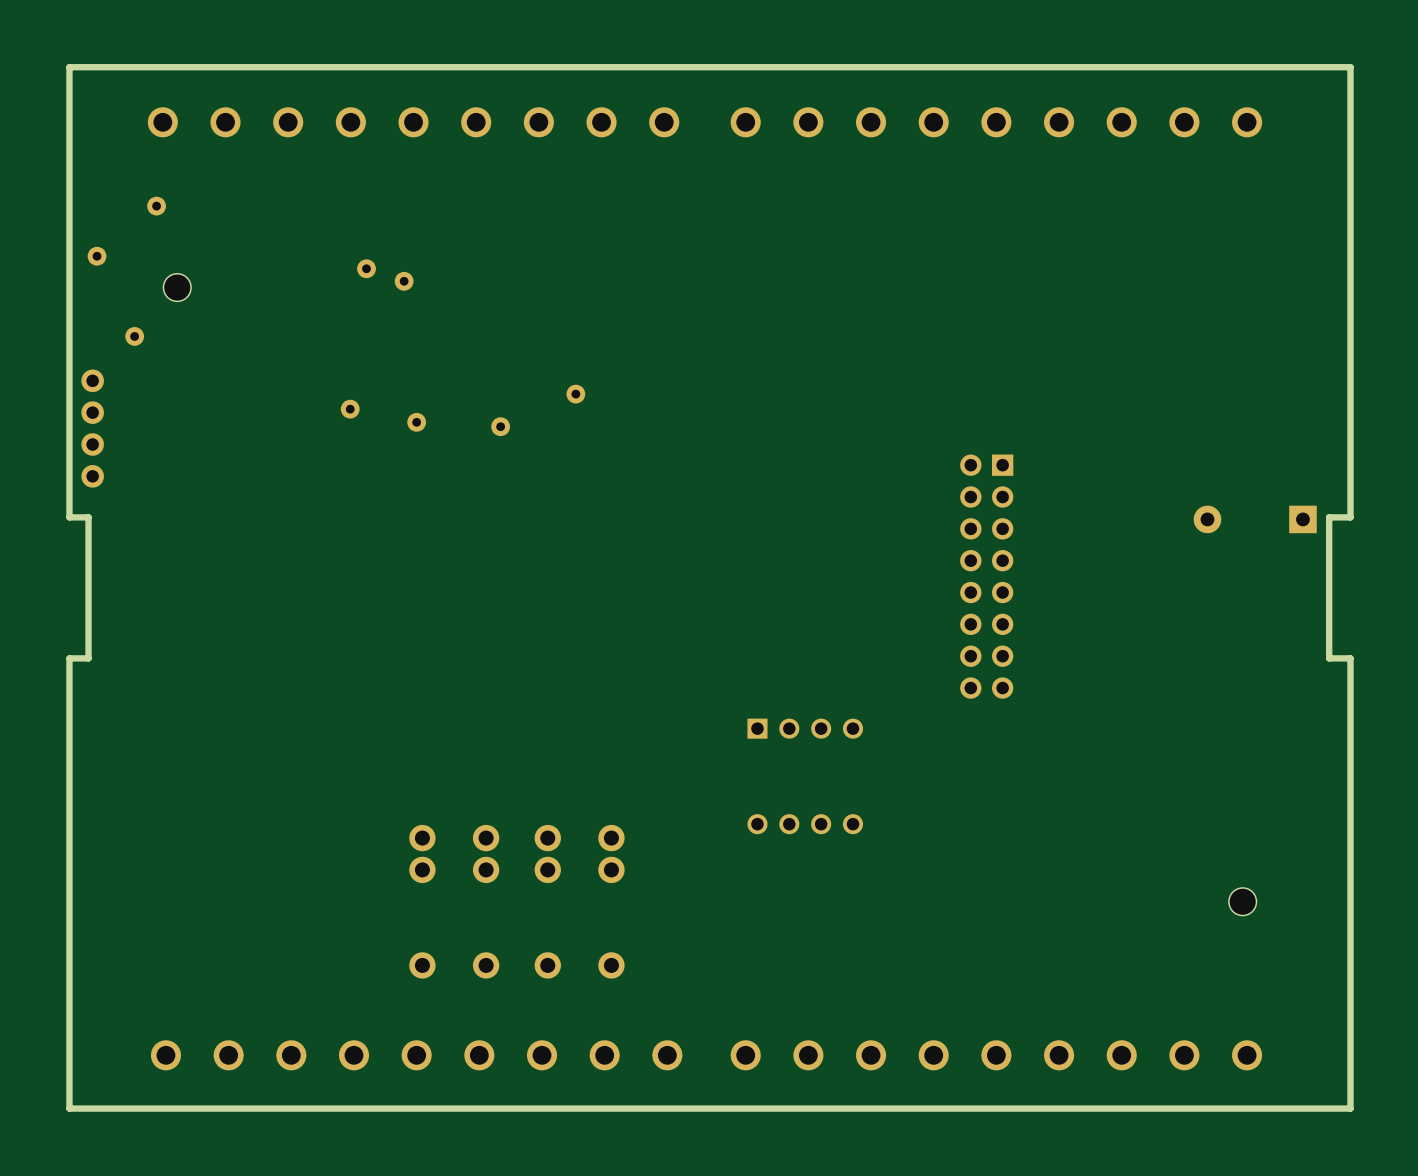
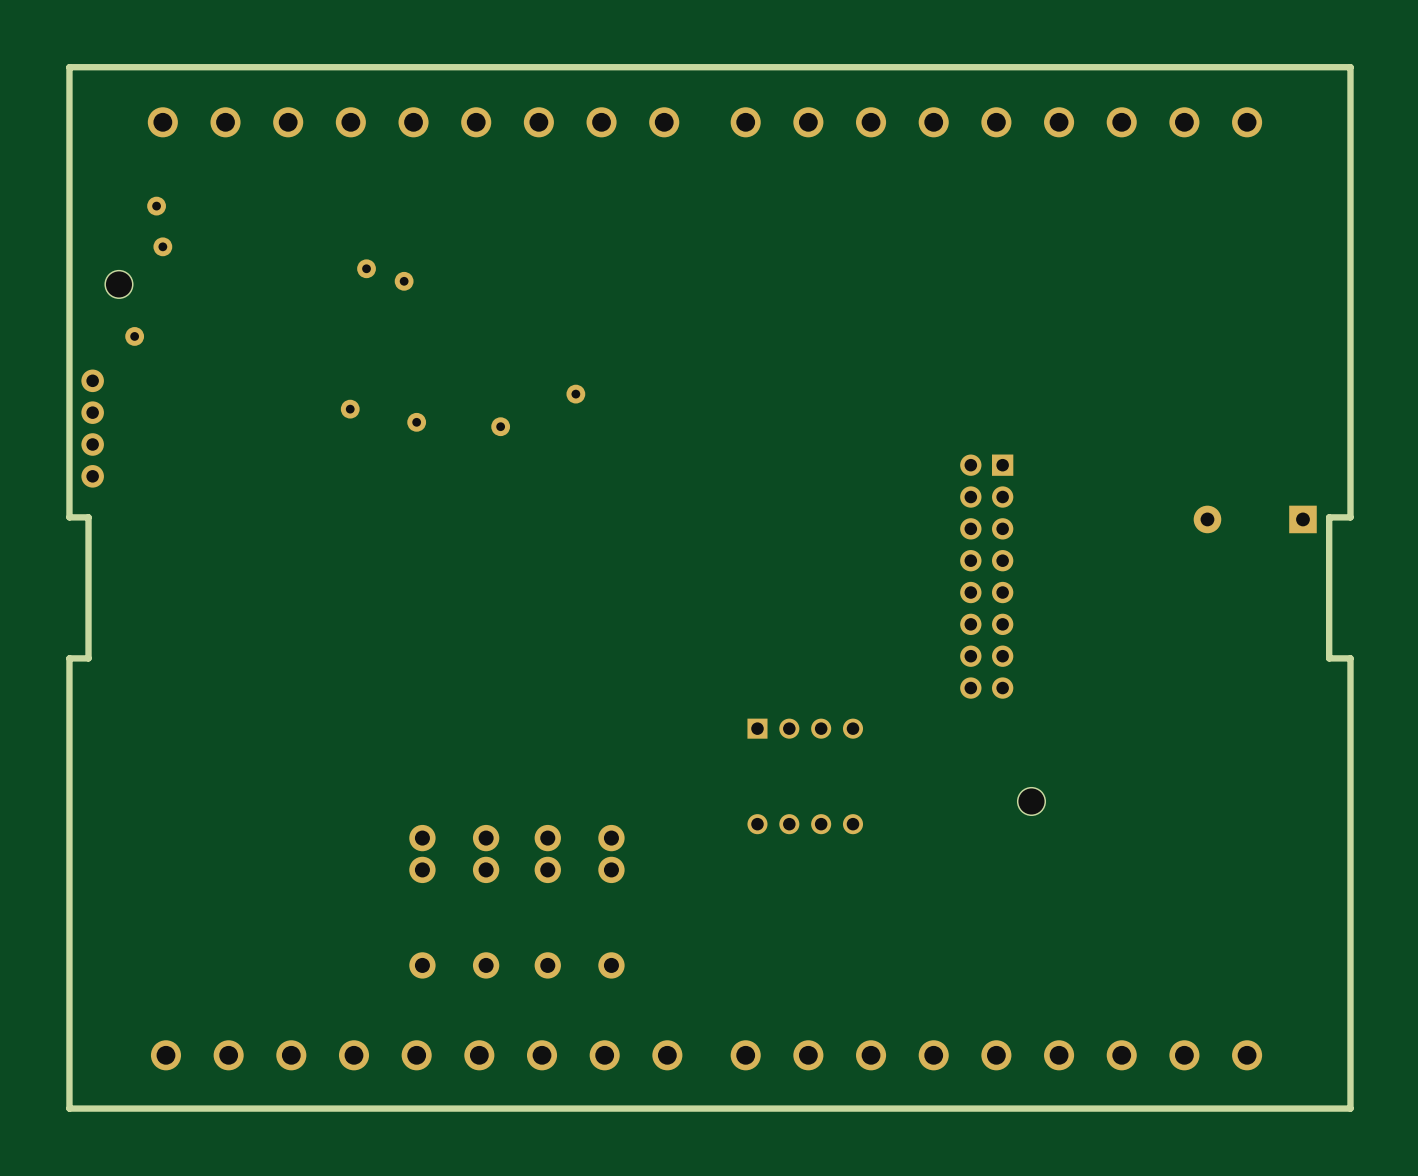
part position: (97, 256) -> (162, 246)
part position: (177, 287) -> (118, 284)
part position: (1242, 901) -> (1031, 801)

